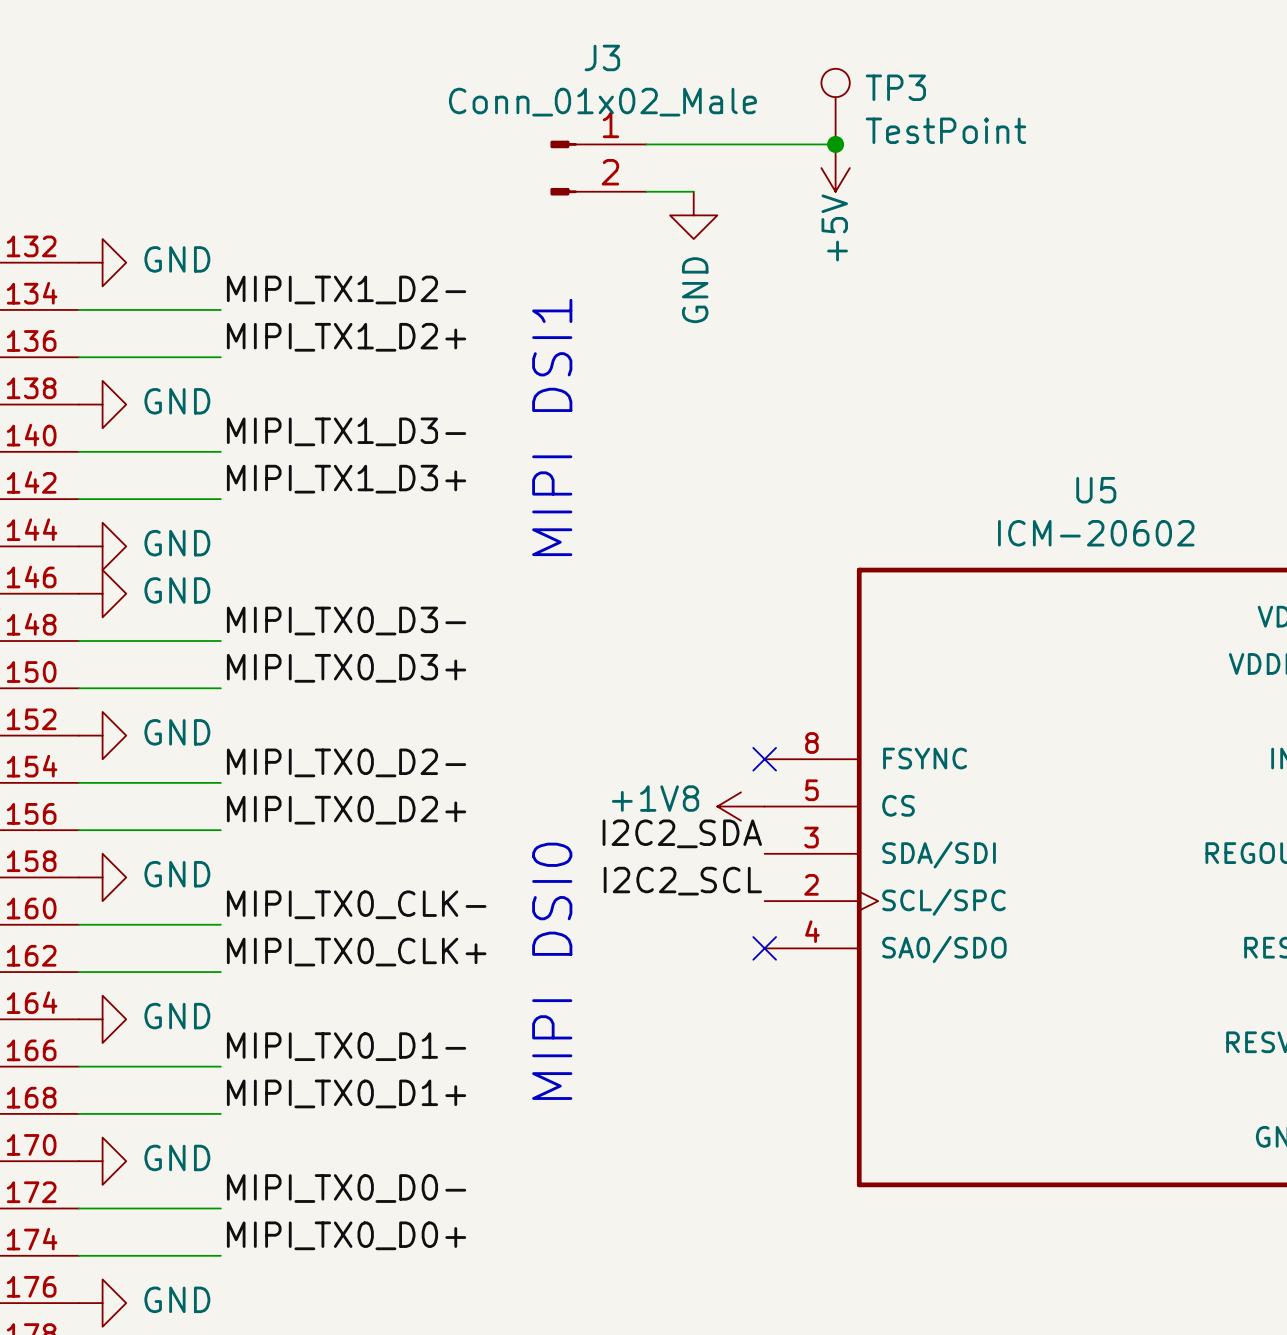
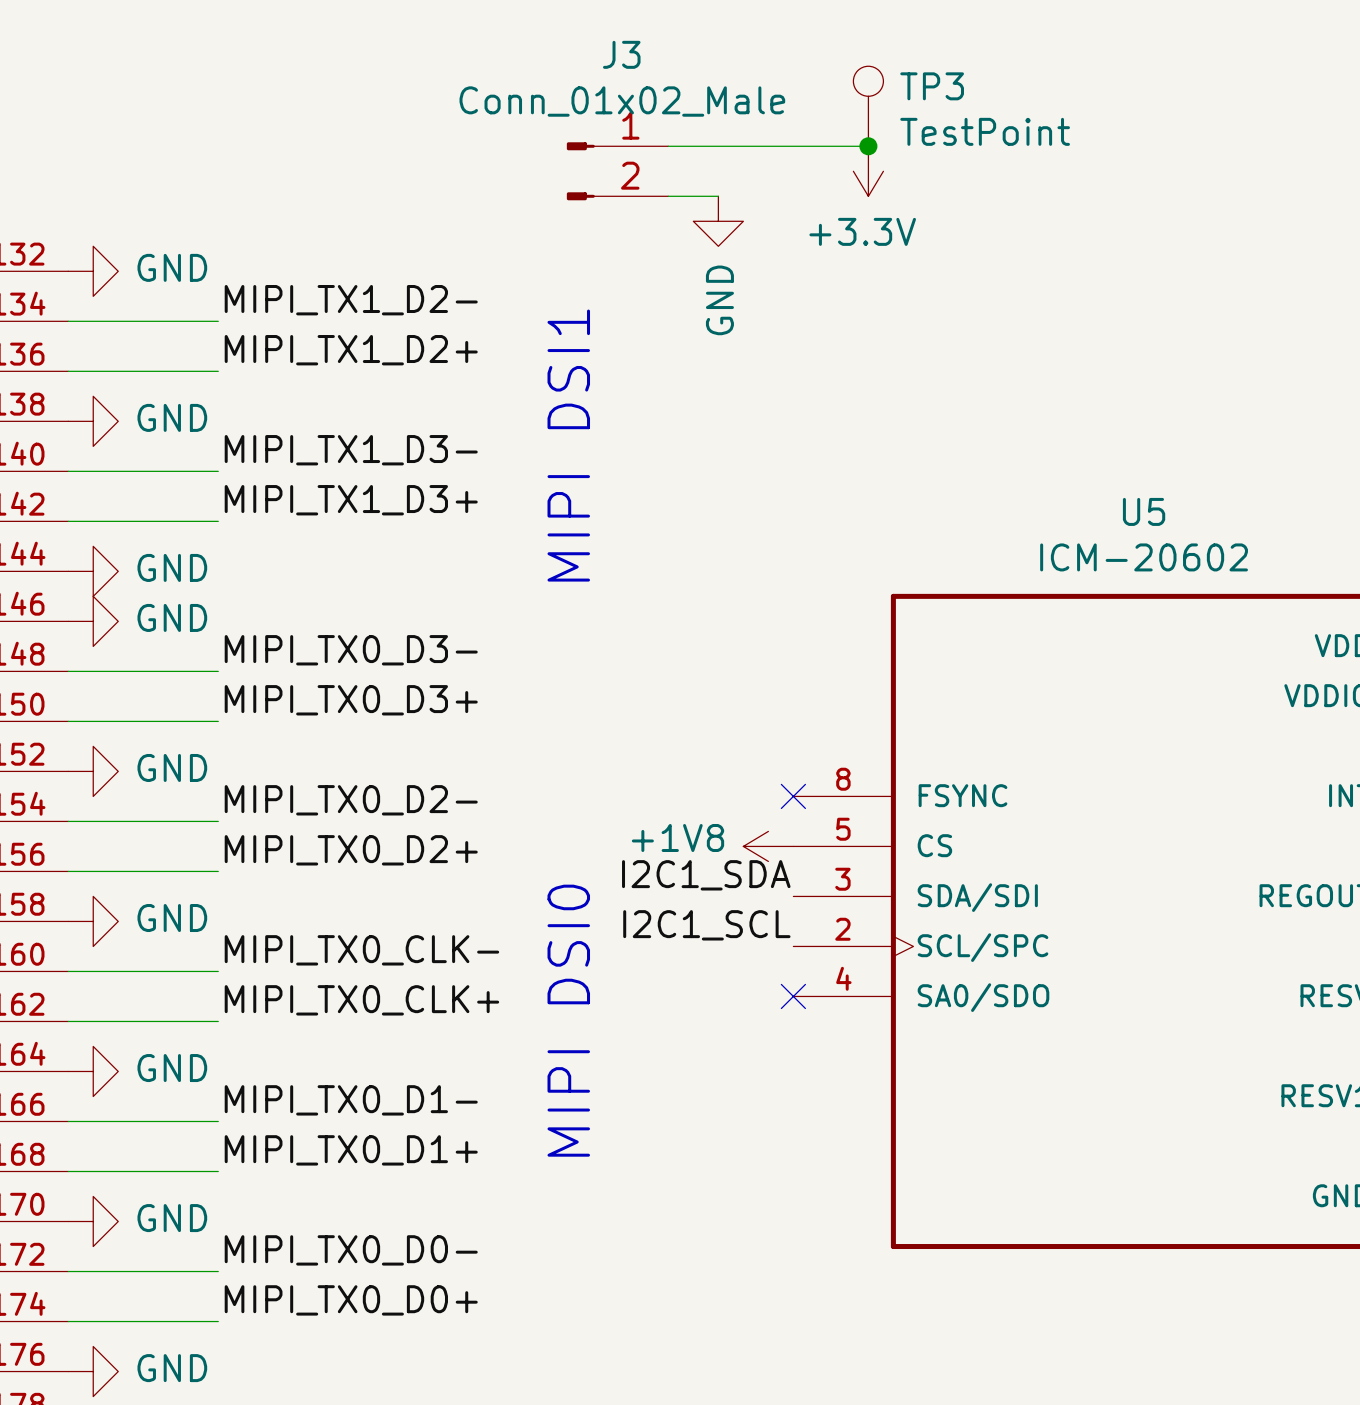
power symbol: +5V (835, 168) -> +3.3V (868, 171)
label: I2C2_SDA (682, 833) -> I2C1_SDA (706, 875)
label: I2C2_SCL (682, 881) -> I2C1_SCL (706, 925)

